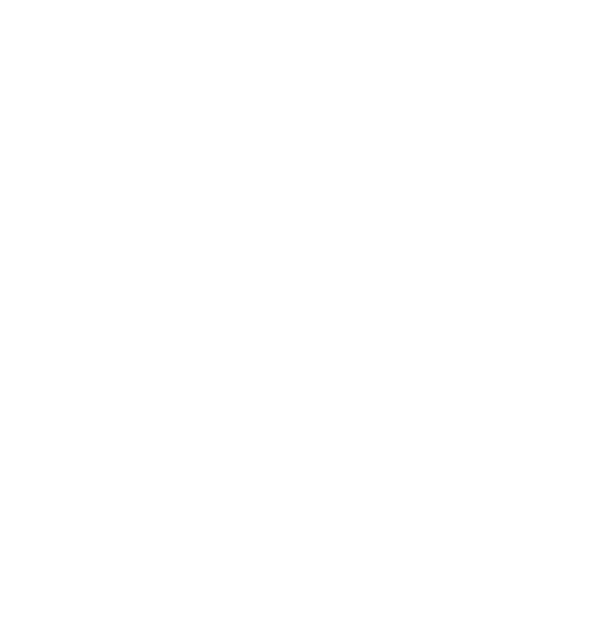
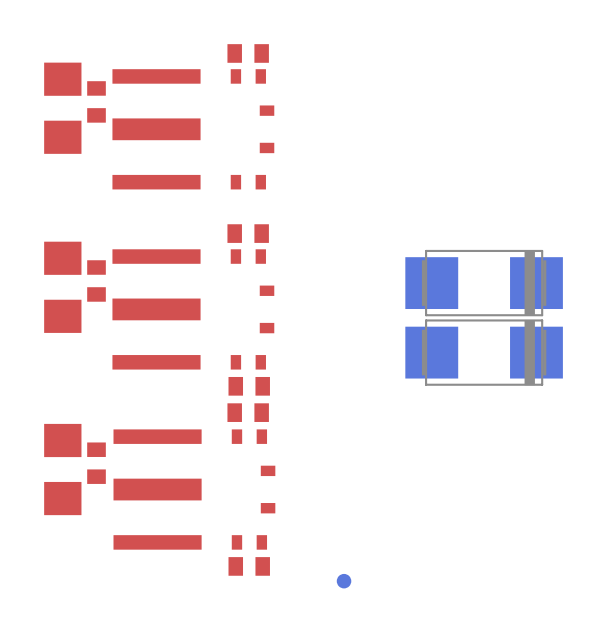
part: none -> (248, 53)
part: none -> (96, 101)
part: none -> (62, 108)
part: none -> (193, 129)
part: none -> (248, 233)
part: none -> (96, 280)
part: none -> (484, 283)
part: none -> (62, 287)
part: none -> (193, 309)
part: none -> (484, 352)
part: none -> (249, 386)
part: none -> (248, 412)
part: none -> (96, 463)
part: none -> (62, 469)
part: none -> (194, 489)
part: none -> (249, 566)
part: none -> (344, 581)

